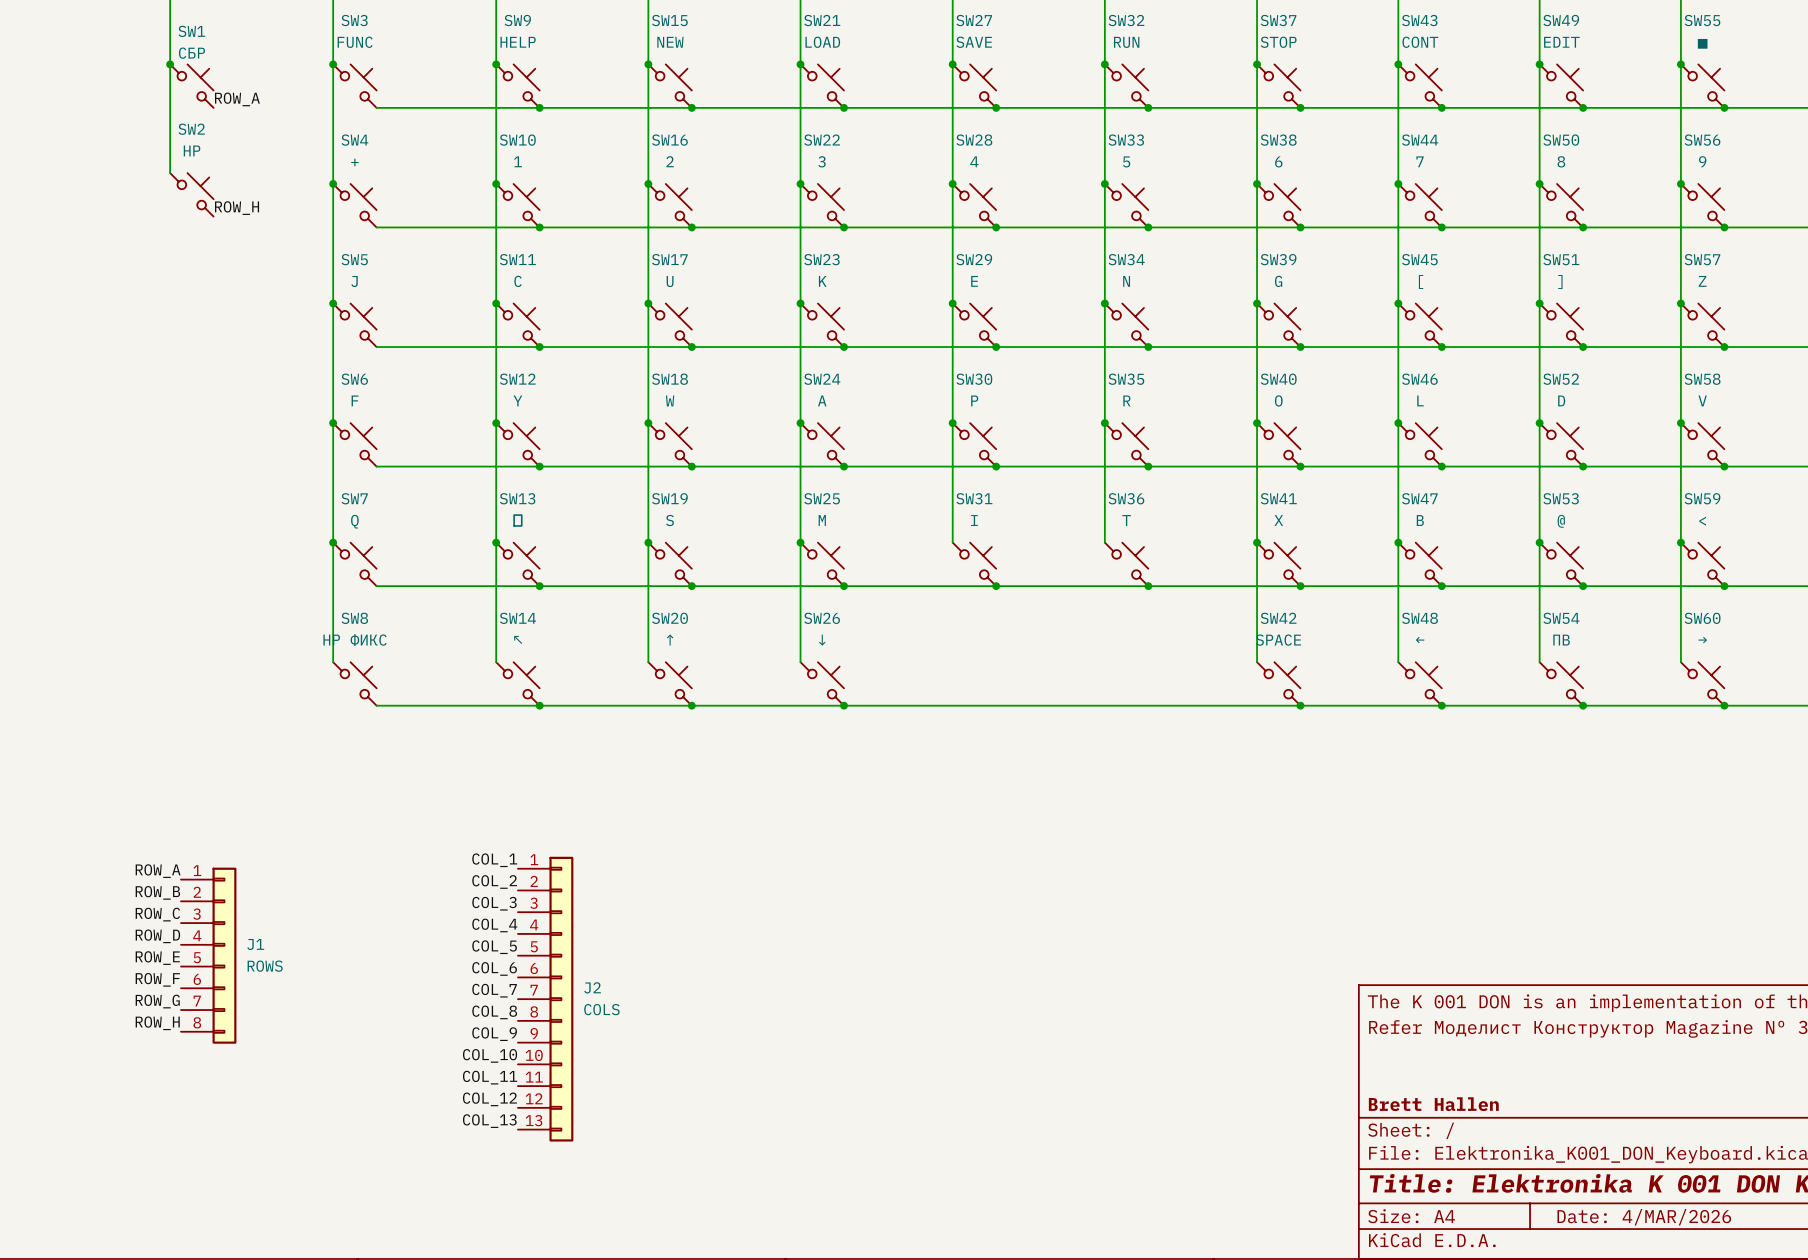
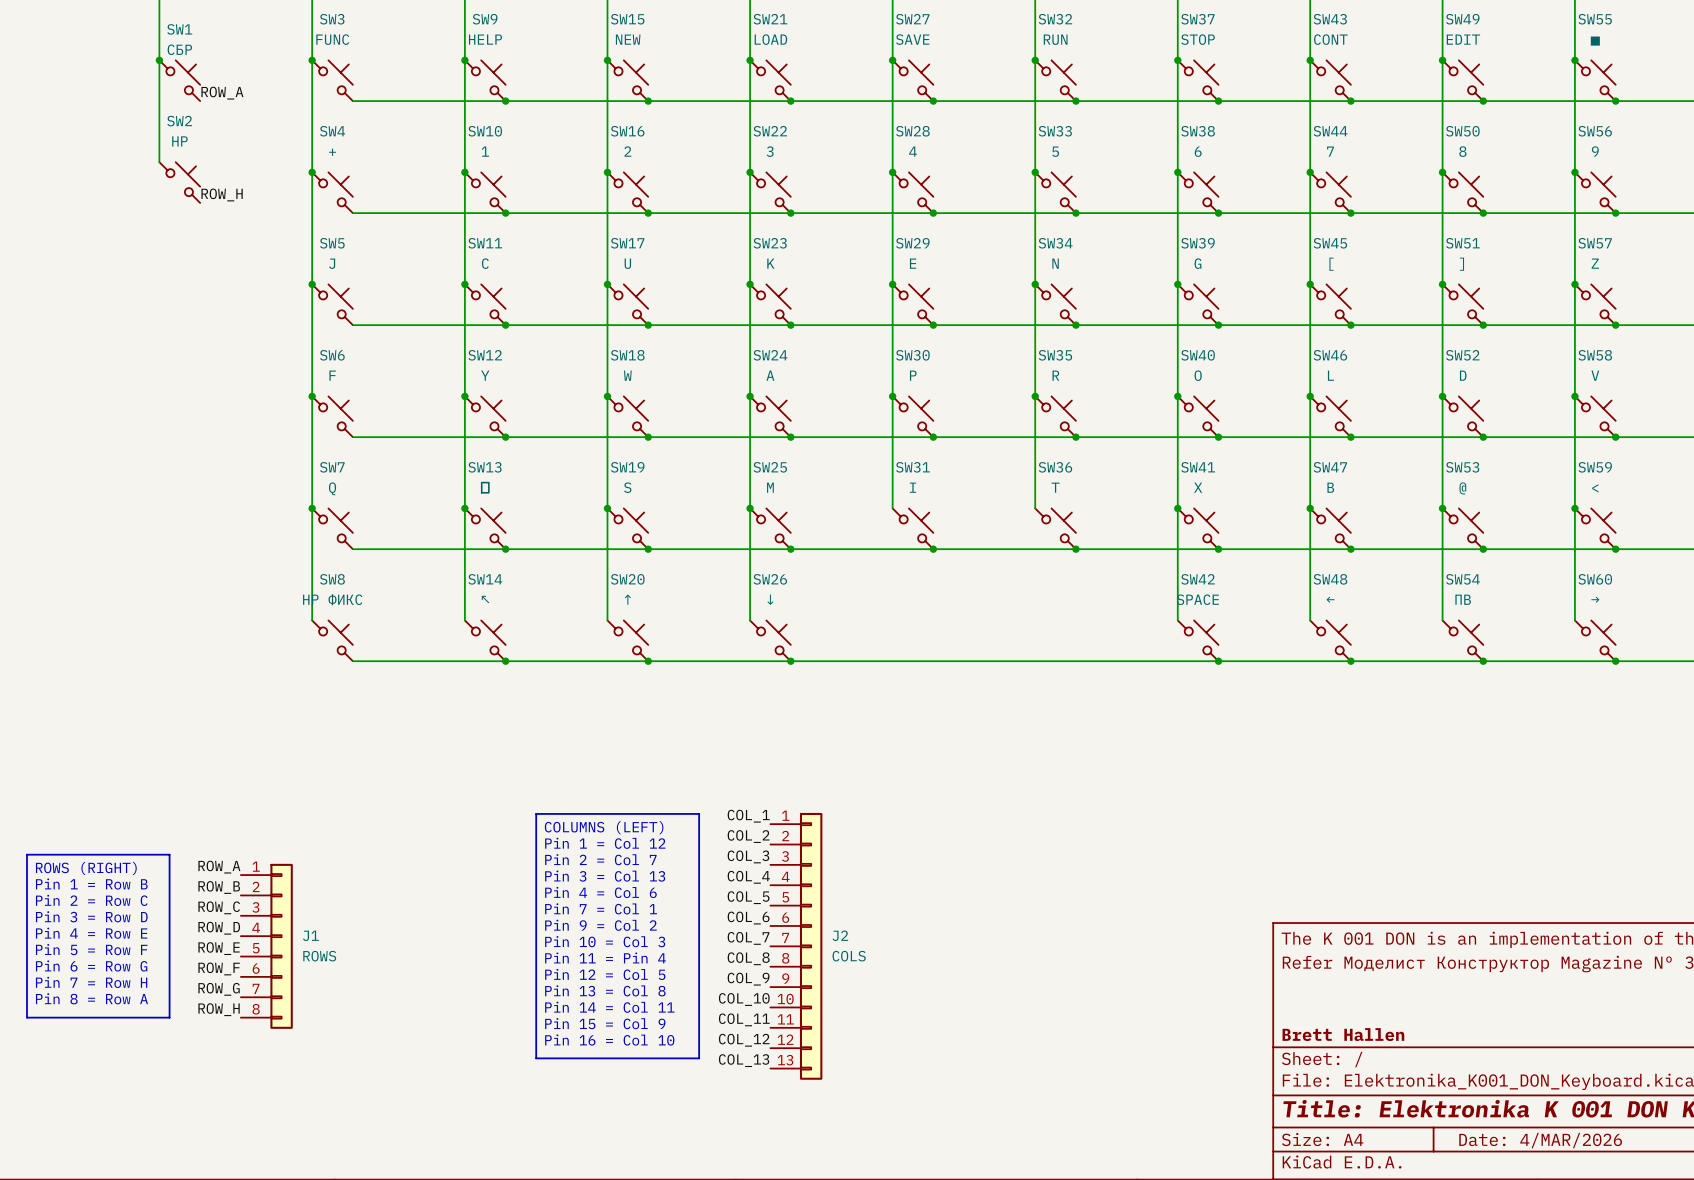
label: COL_1 (494, 860) -> none
line: none -> (536, 813) (699, 813) (699, 1058) (536, 1058) (536, 813)
label position: ROW_A (158, 871) -> ROW_A (219, 867)
label: none -> COL_1 (748, 816)
label: COL_2 (494, 881) -> none
text: none -> COLUMNS (LEFT) (604, 827)
label position: ROW_B (157, 892) -> ROW_B (219, 887)
label: none -> COL_2 (748, 836)
text: none -> Pin 1 = Col 12 (605, 843)
label: COL_3 (494, 903) -> none
line: none -> (27, 854) (169, 854) (169, 1017) (27, 1017) (27, 854)
label position: ROW_C (157, 914) -> ROW_C (219, 907)
label: none -> COL_3 (748, 856)
text: none -> Pin 2 = Col 7 (600, 859)
label: COL_4 (494, 925) -> none
text: none -> ROWS (RIGHT) (86, 868)
text: none -> Pin 3 = Col 13 (605, 876)
label position: ROW_D (157, 936) -> ROW_D (219, 928)
label: none -> COL_4 (748, 877)
text: none -> Pin 1 = Row B (91, 884)
label: COL_5 (494, 947) -> none
text: none -> Pin 4 = Col 6 (600, 892)
J1 position: (208, 955) -> (266, 946)
label position: ROW_E (157, 958) -> ROW_E (219, 948)
label: none -> COL_5 (748, 897)
text: none -> Pin 2 = Row C (91, 900)
label: COL_6 (494, 968) -> none
text: none -> Pin 7 = Col 1 (601, 908)
text: none -> Pin 3 = Row D (91, 916)
label position: ROW_F (157, 979) -> ROW_F (219, 968)
label: none -> COL_6 (748, 918)
text: none -> Pin 9 = Col 2 (600, 925)
label: COL_7 (494, 990) -> none
text: none -> Pin 4 = Row E (91, 933)
J2 position: (545, 999) -> (796, 946)
label position: ROW_G (157, 1001) -> ROW_G (219, 989)
label: none -> COL_7 (748, 938)
text: none -> Pin 10 = Col 3 (605, 941)
label: COL_8 (494, 1012) -> none
text: none -> Pin 5 = Row F (91, 949)
text: none -> Pin 11 = Pin 4 (605, 957)
label position: ROW_H (157, 1023) -> ROW_H (219, 1009)
label: none -> COL_8 (748, 958)
text: none -> Pin 6 = Row G (91, 966)
label: COL_9 (494, 1034) -> none
text: none -> Pin 12 = Col 5 (605, 974)
label: none -> COL_9 (748, 979)
text: none -> Pin 7 = Row H (91, 982)
label: COL_10 (490, 1055) -> none
text: none -> Pin 13 = Col 8 (605, 990)
text: none -> Pin 8 = Row A (91, 998)
label: none -> COL_10 (744, 999)
text: none -> Pin 14 = Col 11 (609, 1007)
label: COL_11 (490, 1077) -> none
label: none -> COL_11 (744, 1019)
text: none -> Pin 15 = Col 9 (605, 1023)
label: COL_12 (489, 1099) -> none
text: none -> Pin 16 = Col 10 (609, 1040)
label: none -> COL_12 (744, 1040)
label: COL_13 (489, 1121) -> none
label: none -> COL_13 (744, 1060)

